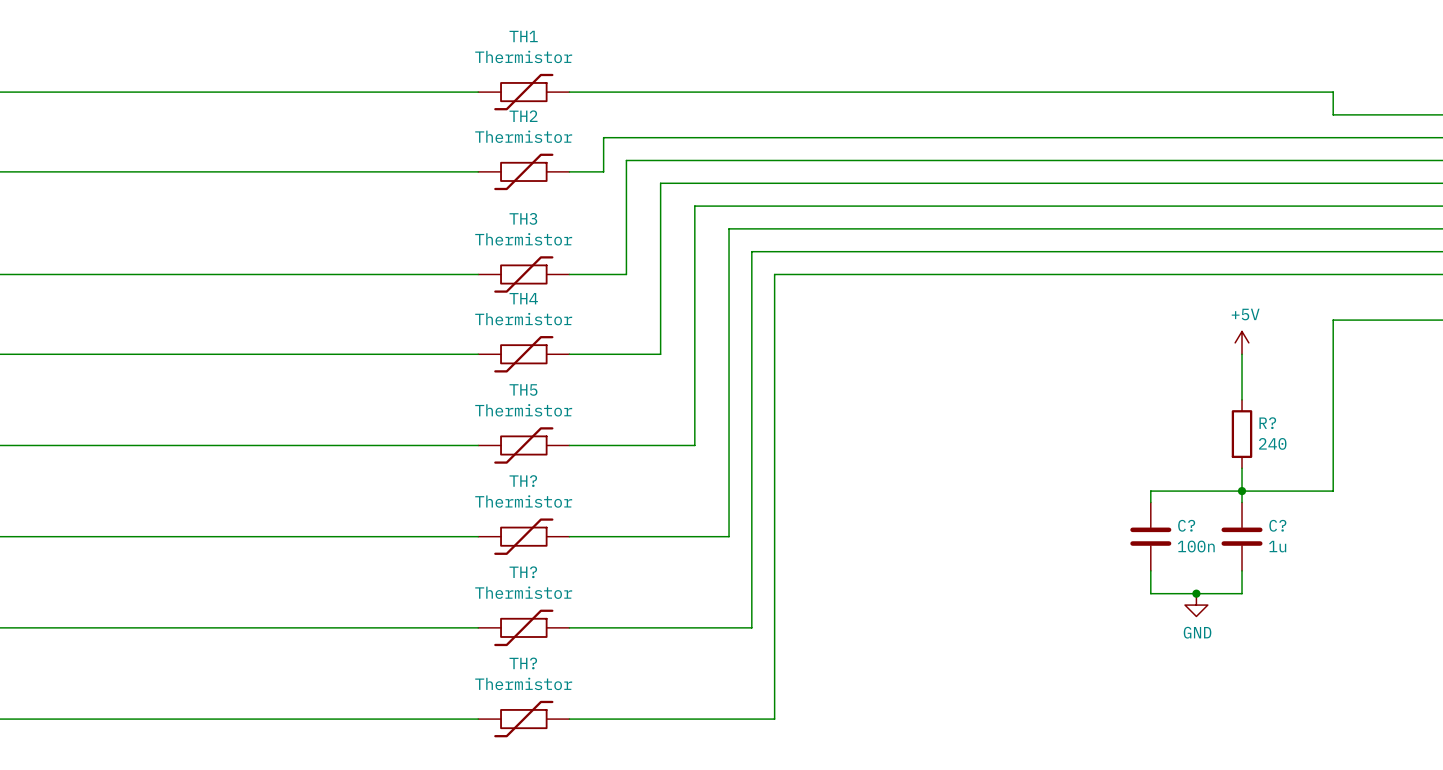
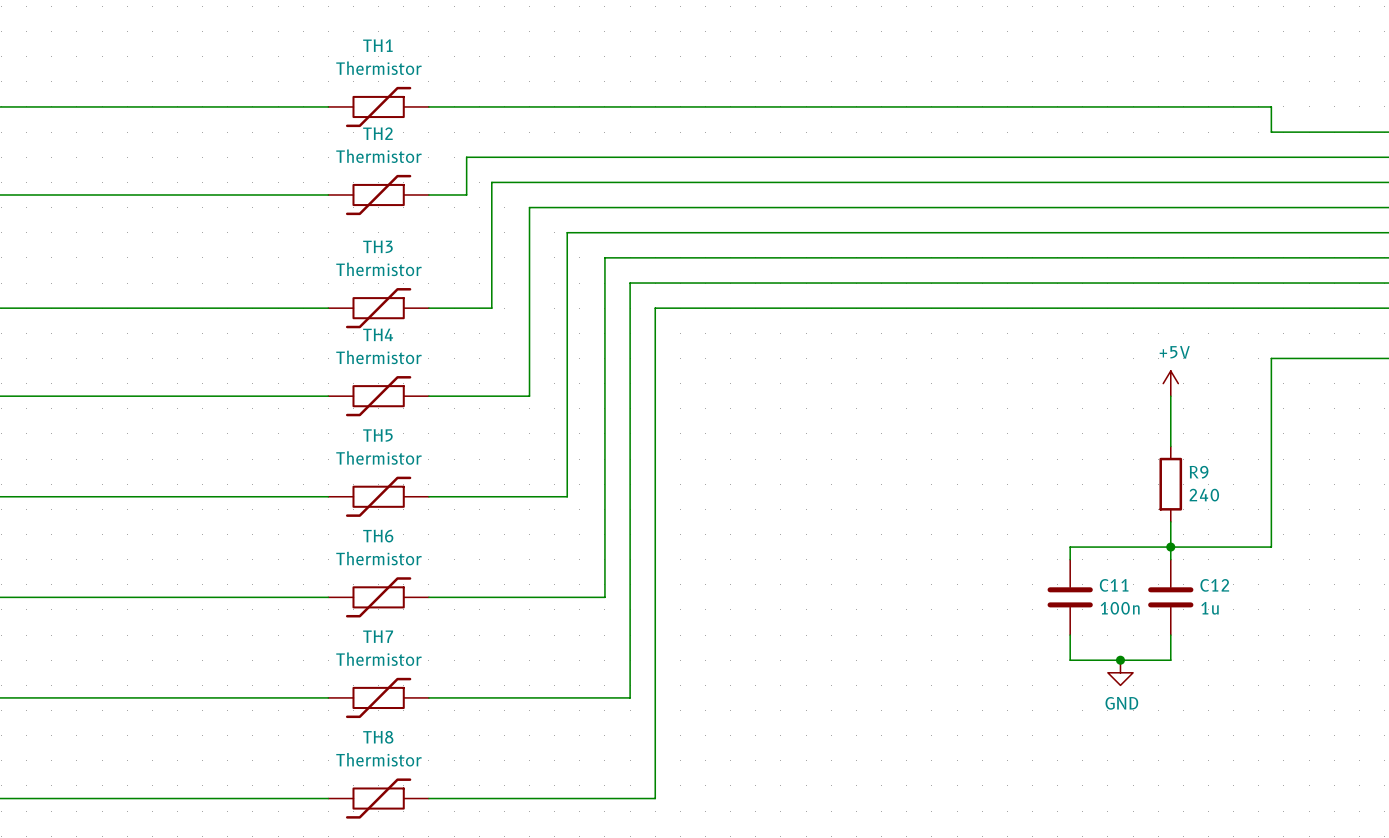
R? name: R? (1267, 423) -> R9 (1199, 472)
TH? name: TH? (523, 481) -> TH6 (378, 536)
C? name: C? (1186, 525) -> C11 (1114, 585)
C? name: C? (1277, 525) -> C12 (1214, 585)
TH? name: TH? (523, 572) -> TH7 (378, 636)
TH? name: TH? (523, 663) -> TH8 (378, 737)

